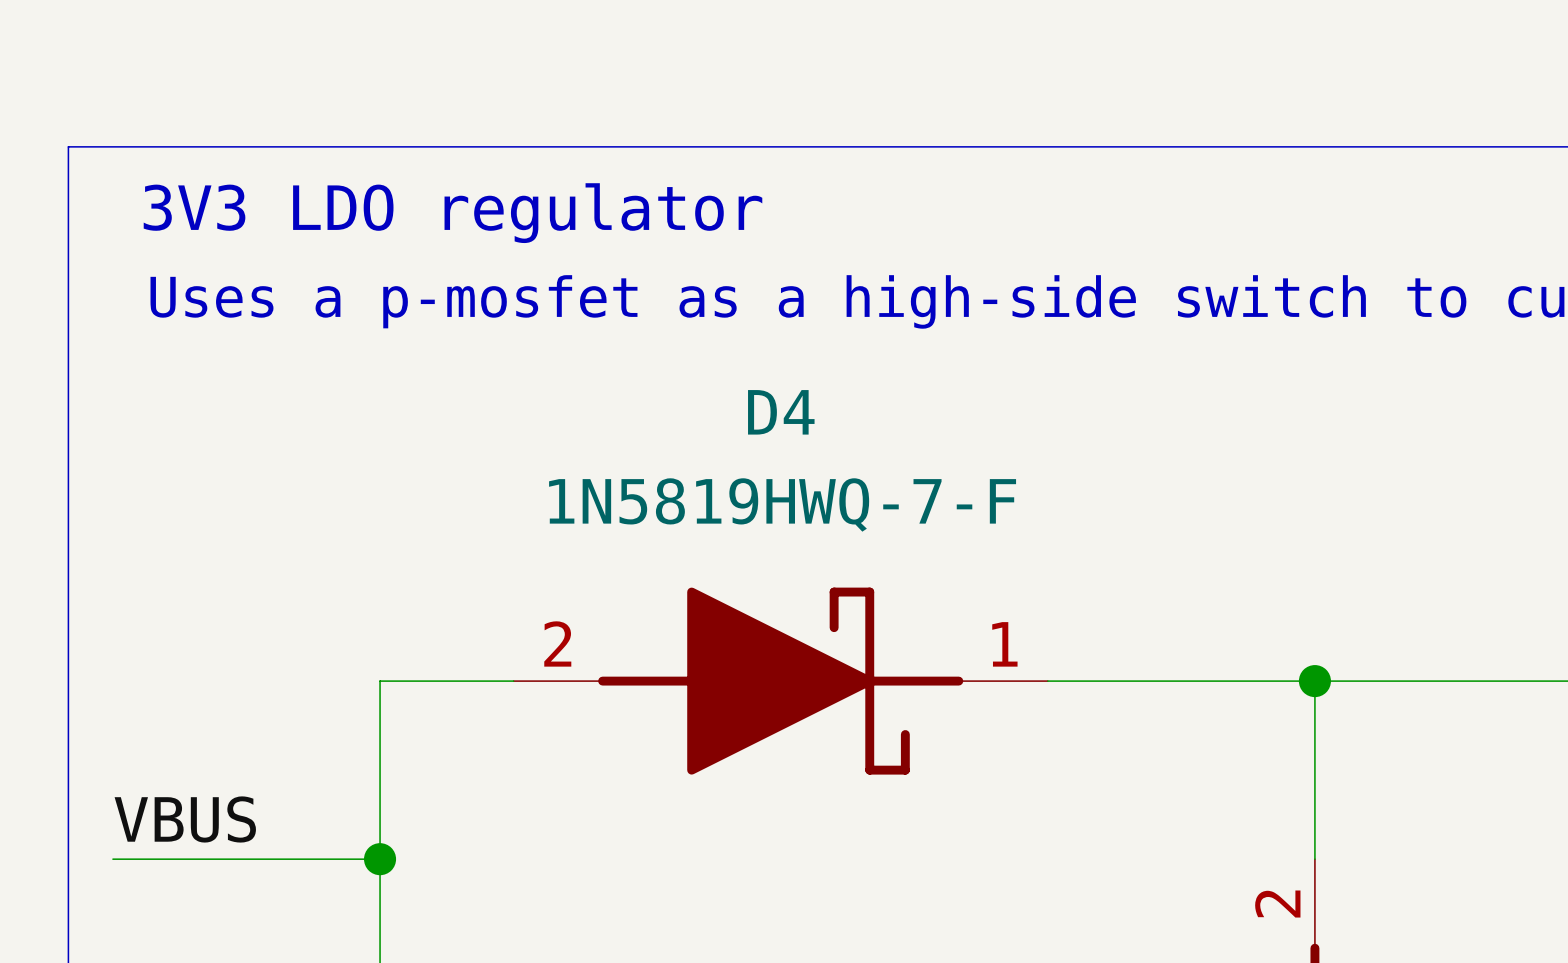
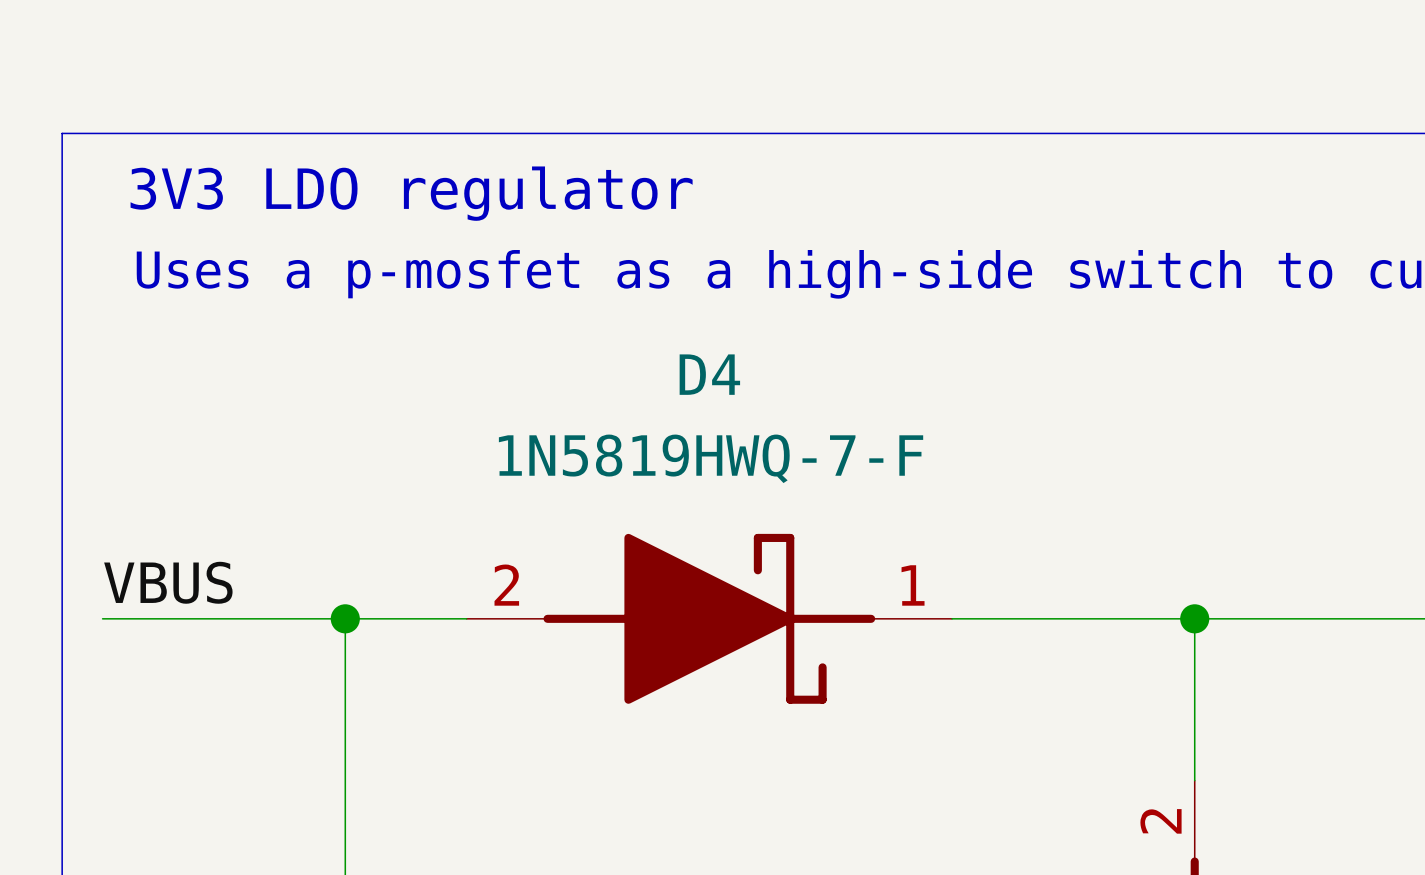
label position: VBUS (185, 819) -> VBUS (168, 582)
wire: (112, 859) (380, 859) -> (102, 618) (345, 618)
junction position: (380, 859) -> (345, 618)

